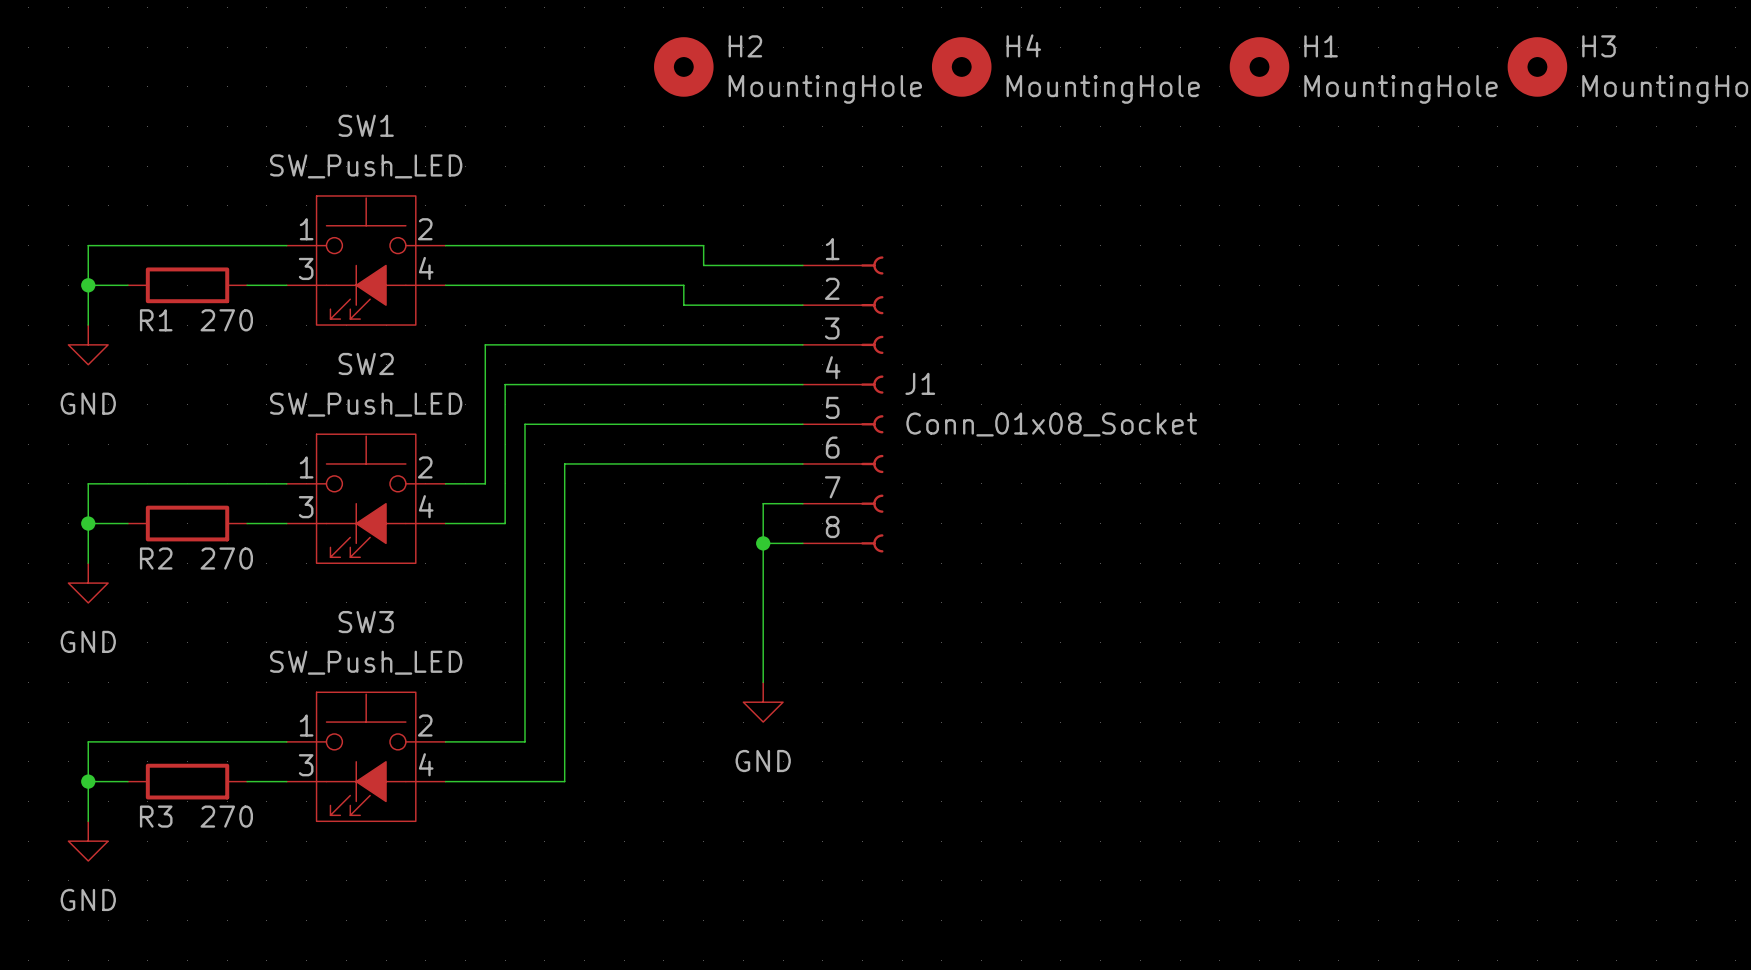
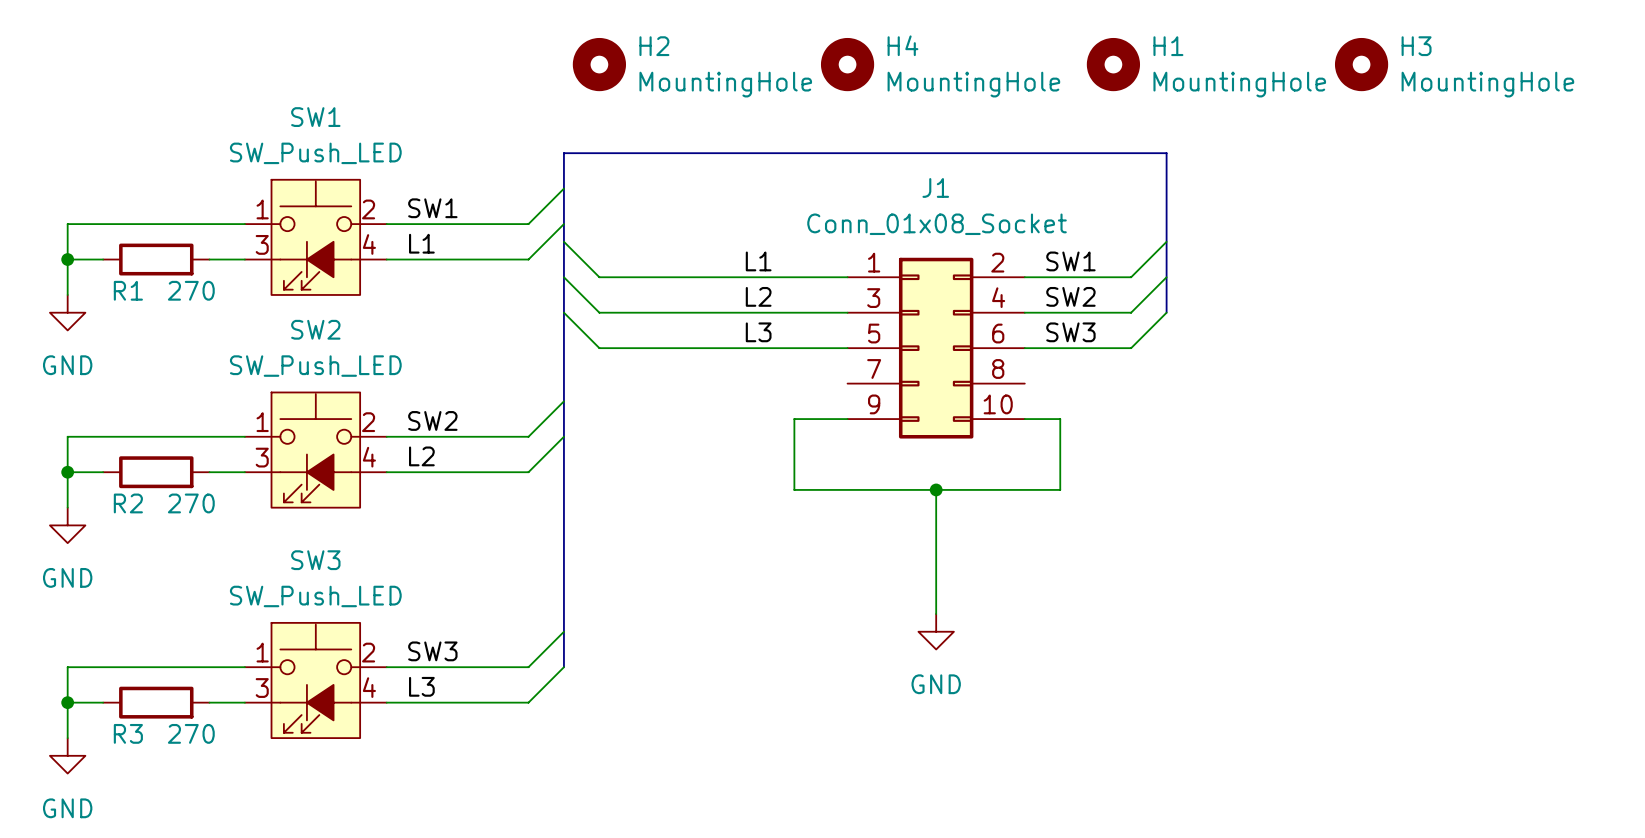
label: none -> SW1 (432, 208)
wire: (604, 245) (703, 245) (703, 265) (802, 265) -> (528, 224) (563, 188)
wire: none -> (563, 224) (528, 259)
J1 symbol: [802, 256, 884, 553] -> [847, 257, 1025, 439]
wire: none -> (1166, 241) (1131, 277) (1024, 277)
label: none -> L1 (421, 243)
wire: (604, 285) (683, 285) (683, 305) -> (563, 241) (599, 277)
label: none -> L1 (758, 261)
label: none -> SW1 (1070, 261)
wire: none -> (563, 277) (599, 312)
wire: none -> (705, 277) (847, 277)
wire: none -> (1166, 277) (1131, 312) (1024, 312)
label: none -> L2 (758, 296)
label: none -> SW2 (1070, 296)
wire: none -> (563, 312) (599, 348)
wire: (683, 344) (485, 344) (485, 483) -> (563, 401) (528, 436) (422, 436)
wire: none -> (705, 312) (847, 312)
wire: none -> (1166, 312) (1131, 348) (1024, 348)
bus: none -> (1166, 312) (1166, 153) (563, 153) (563, 667)
label: none -> L3 (758, 332)
label: none -> SW3 (1070, 332)
J1 name position: J1 (920, 383) -> J1 (935, 187)
wire: (683, 384) (505, 384) (505, 523) -> (563, 436) (528, 472) (439, 472)
wire: none -> (705, 348) (847, 348)
wire: (802, 424) (524, 424) (524, 741) -> (563, 631) (528, 667) (457, 667)
J1 value position: Conn_01x08_Socket (1051, 424) -> Conn_01x08_Socket (937, 224)
wire: (802, 463) (564, 463) (564, 781) -> (563, 667) (528, 702) (493, 702)
wire: none -> (847, 419) (794, 419) (794, 489) (1060, 489) (1060, 419) (1024, 419)
label: none -> SW2 (432, 420)
wire: (802, 503) (763, 503) (763, 682) -> none
label: none -> L2 (421, 456)
wire: (763, 543) (802, 543) -> none
junction: (763, 543) -> none
wire: none -> (936, 489) (936, 614)
junction: none -> (936, 489)
power symbol position: GND (763, 702) -> GND (936, 631)
label: none -> SW3 (432, 651)
label: none -> L3 (421, 686)

